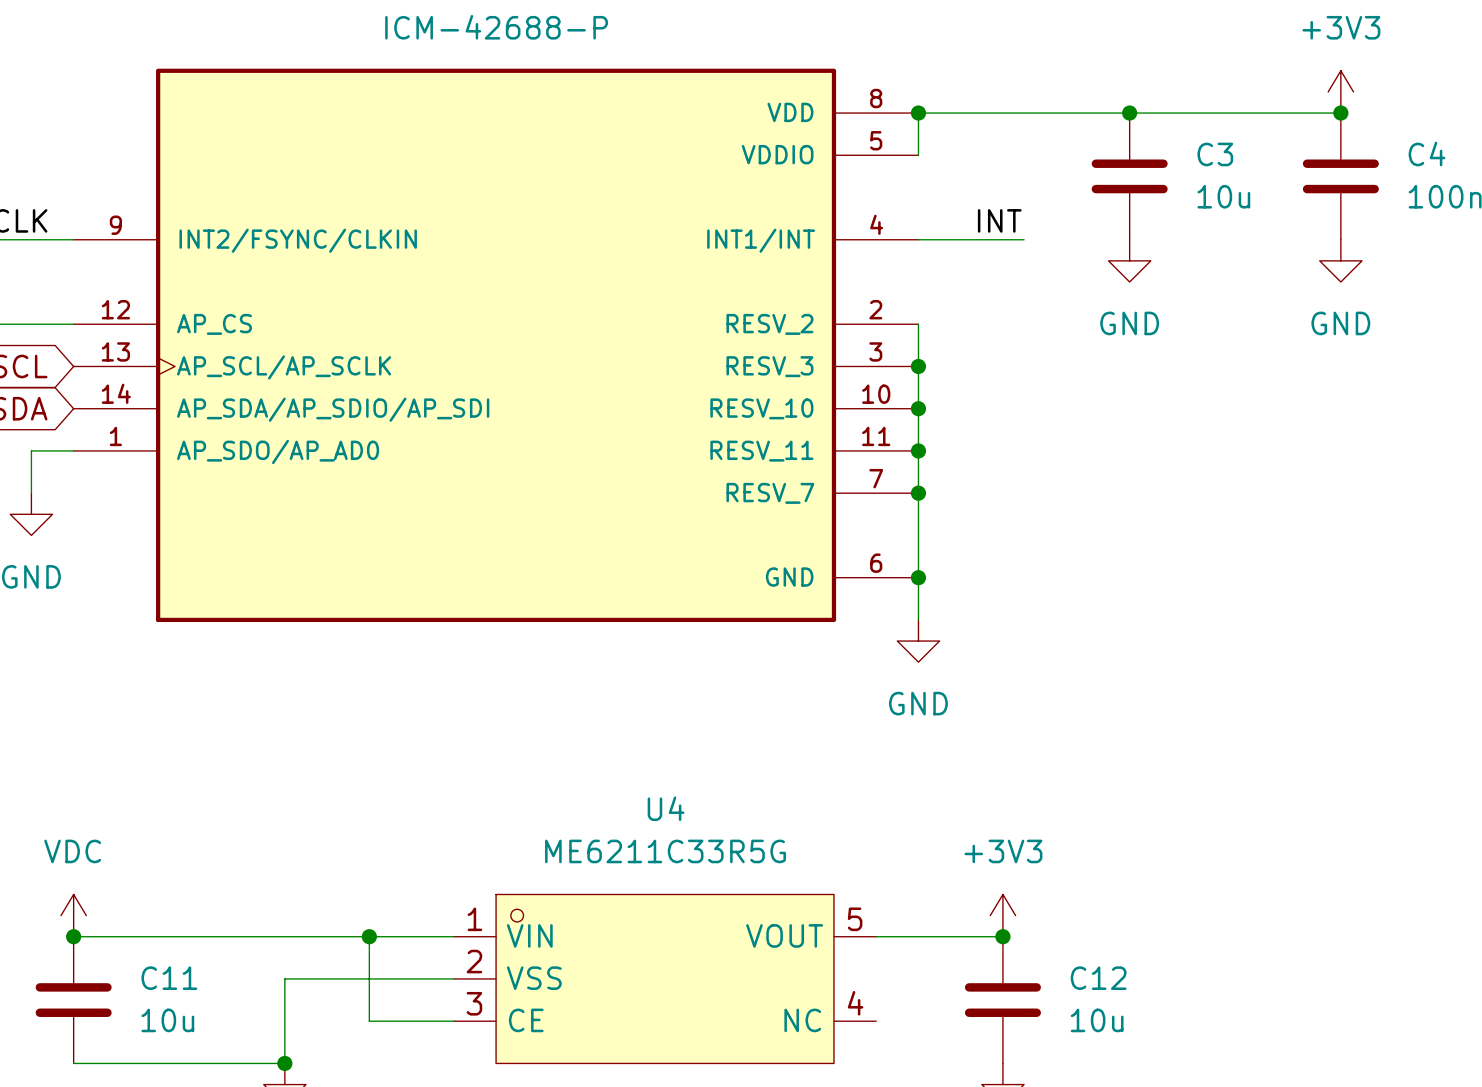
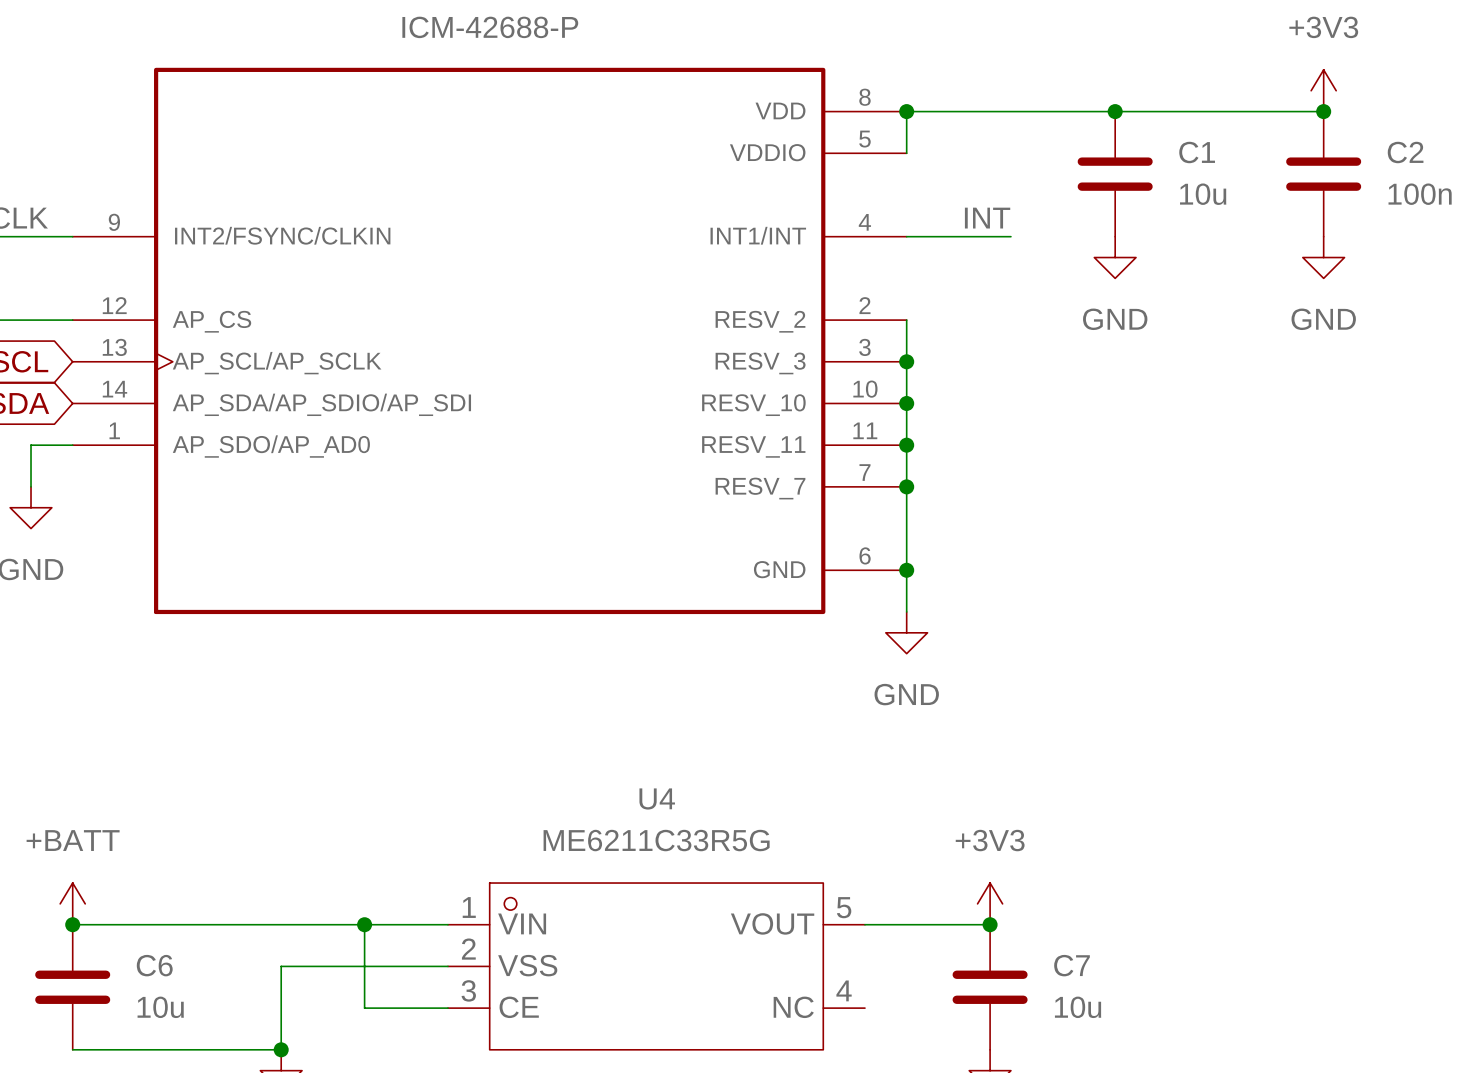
C4 name: C4 (1427, 153) -> C2 (1405, 152)
C3 name: C3 (1215, 154) -> C1 (1197, 152)
power symbol: VDC (73, 915) -> +BATT (72, 903)
C11 name: C11 (169, 978) -> C6 (154, 965)
C12 name: C12 (1098, 978) -> C7 (1072, 965)

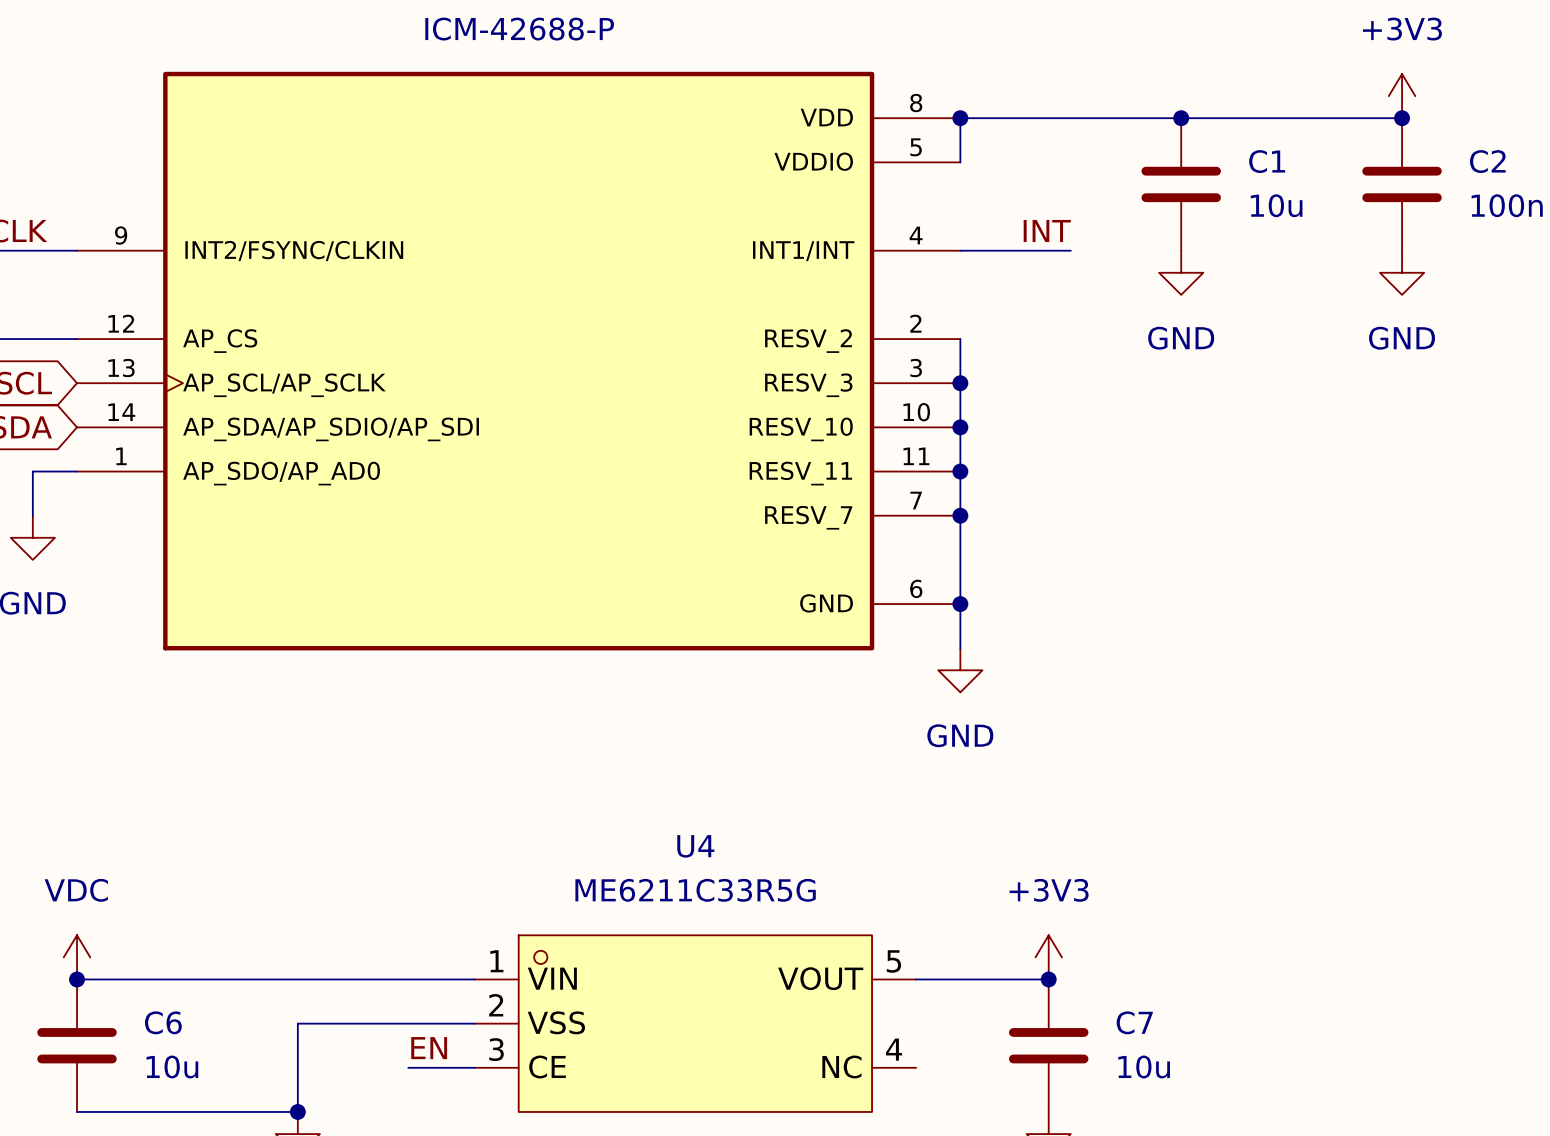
power symbol: +BATT (72, 903) -> VDC (77, 957)
wire: (364, 924) (364, 1008) (385, 1008) -> none
junction: (364, 924) -> none
label: none -> EN (429, 1048)

